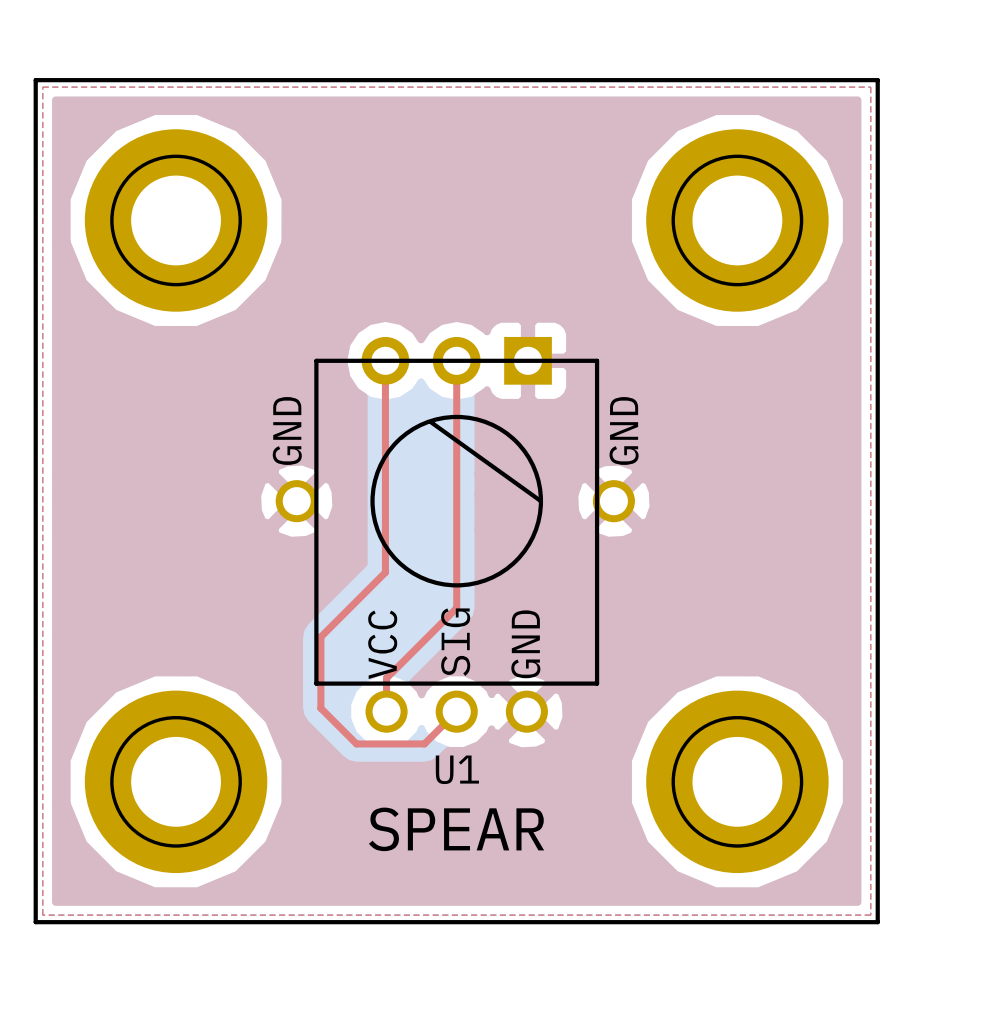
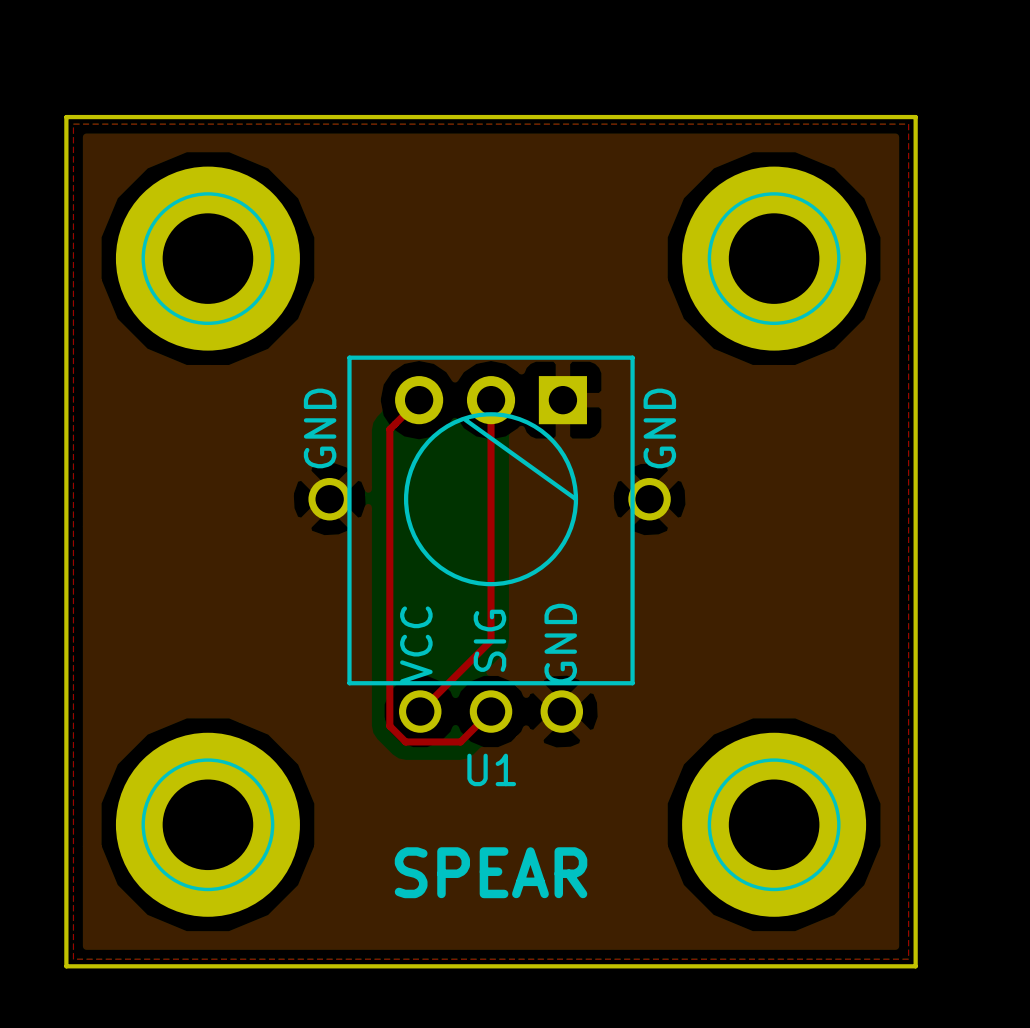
top track: (385, 360) (385, 572) (320, 637) (320, 708) (356, 743) (424, 743) (456, 711) -> (419, 400) (389, 429) (389, 726) (405, 741) (460, 741) (491, 711)
U1 position: (455, 545) -> (489, 544)
top track: (456, 599) (456, 608) (386, 678) (386, 711) -> (491, 640) (420, 711)

